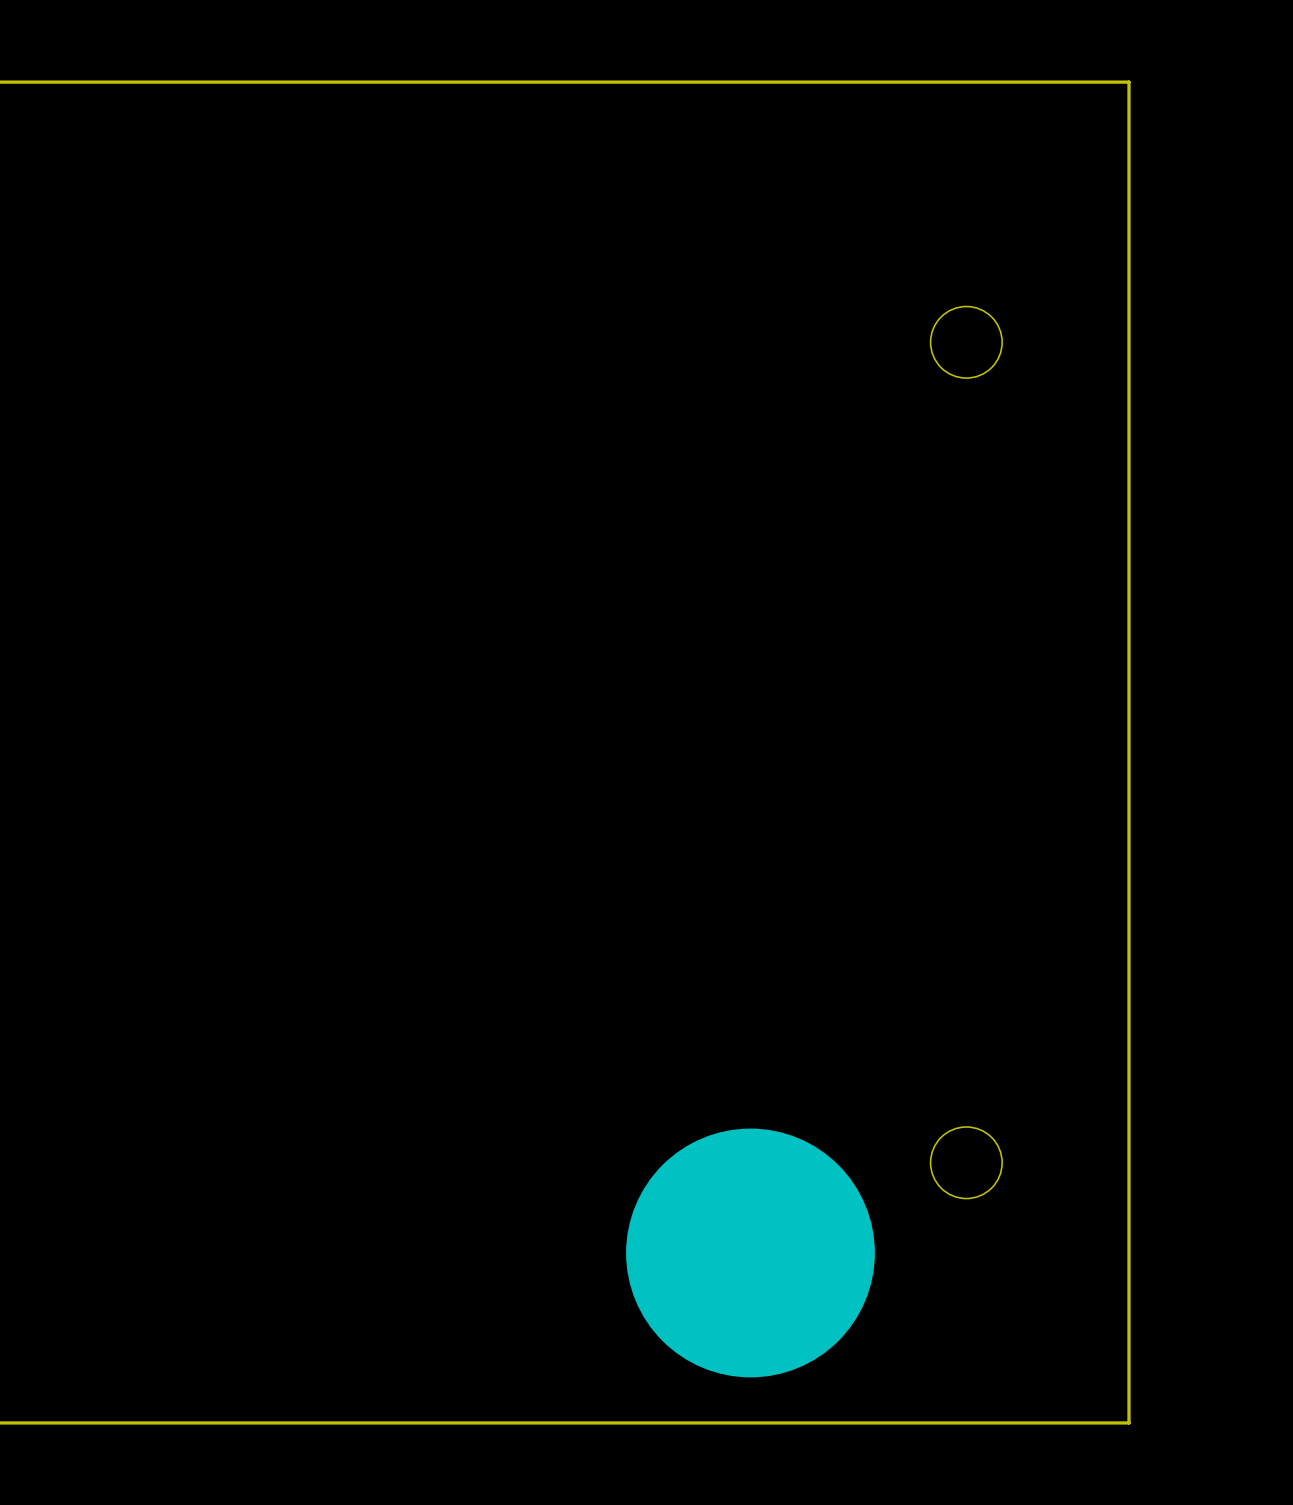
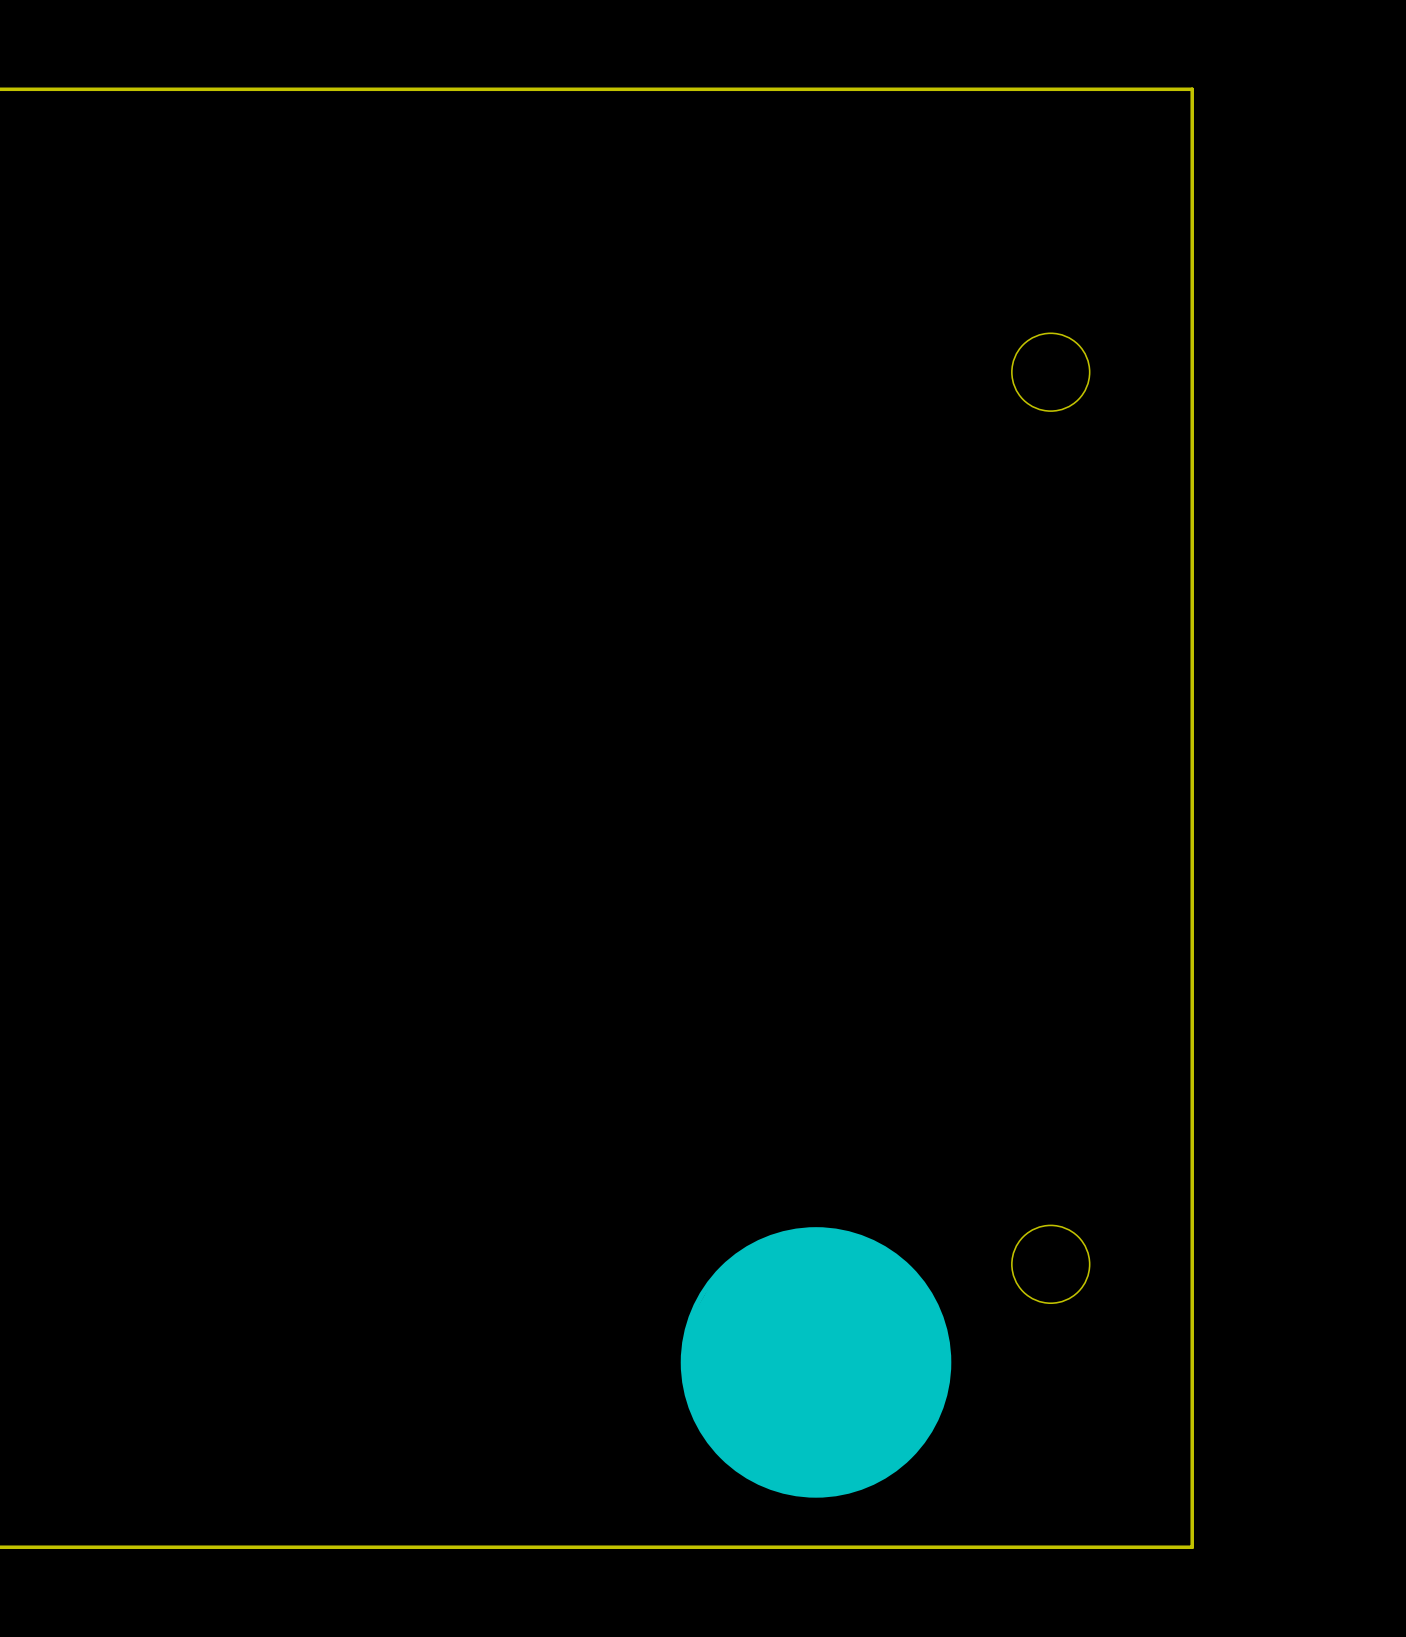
board edge: (1096, 82) (1128, 82) (1128, 1422) (1096, 1422) -> (1192, 89) (1192, 1547)

